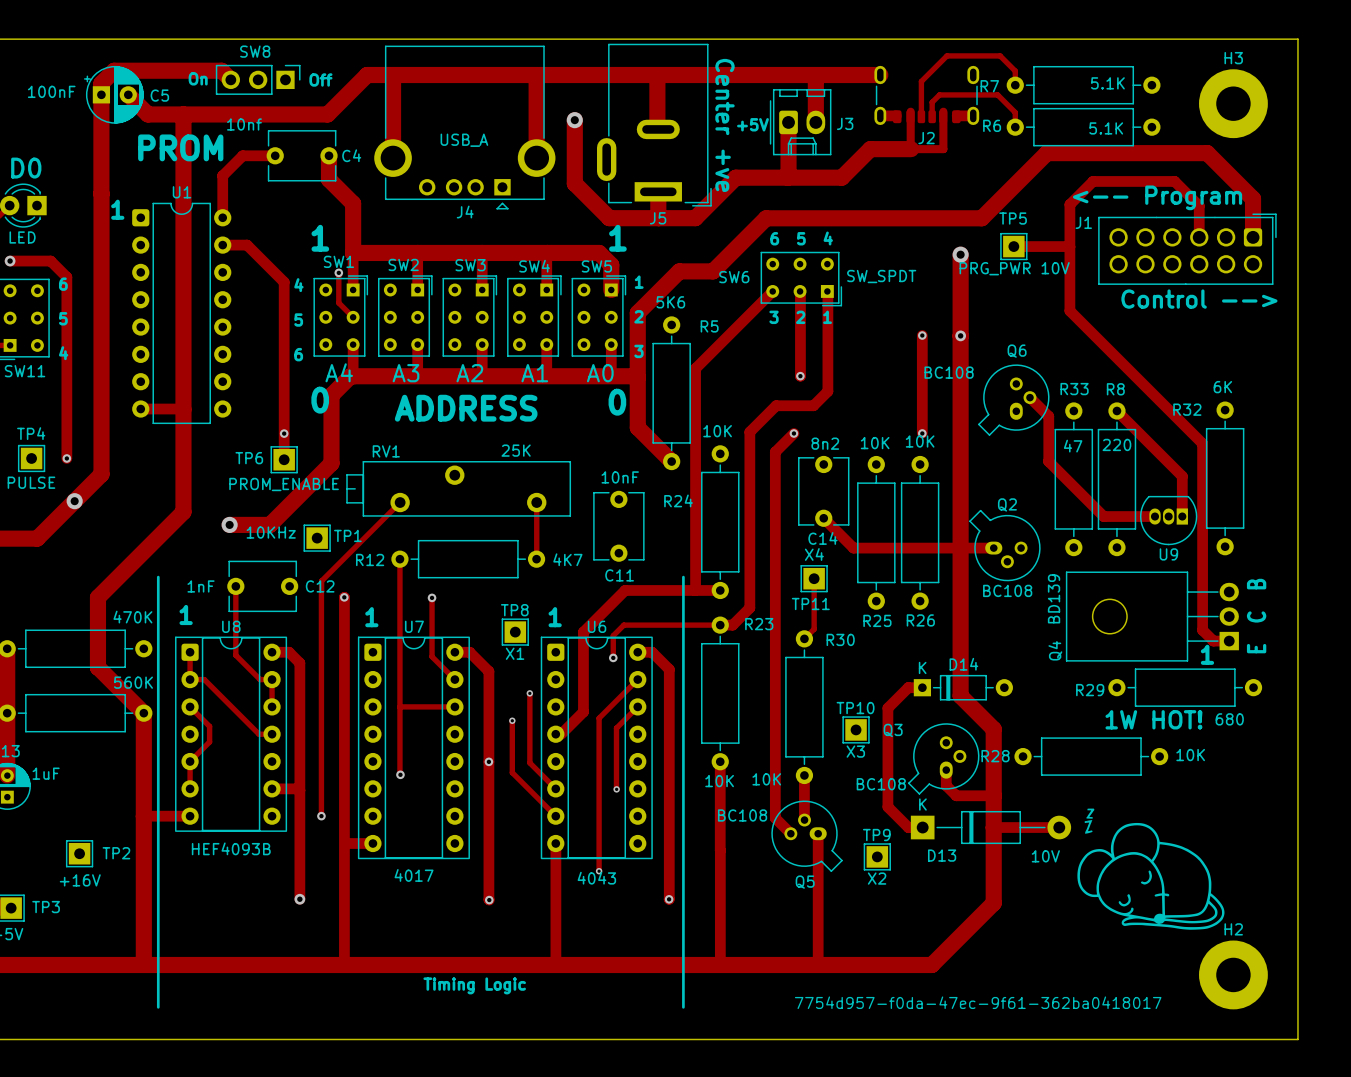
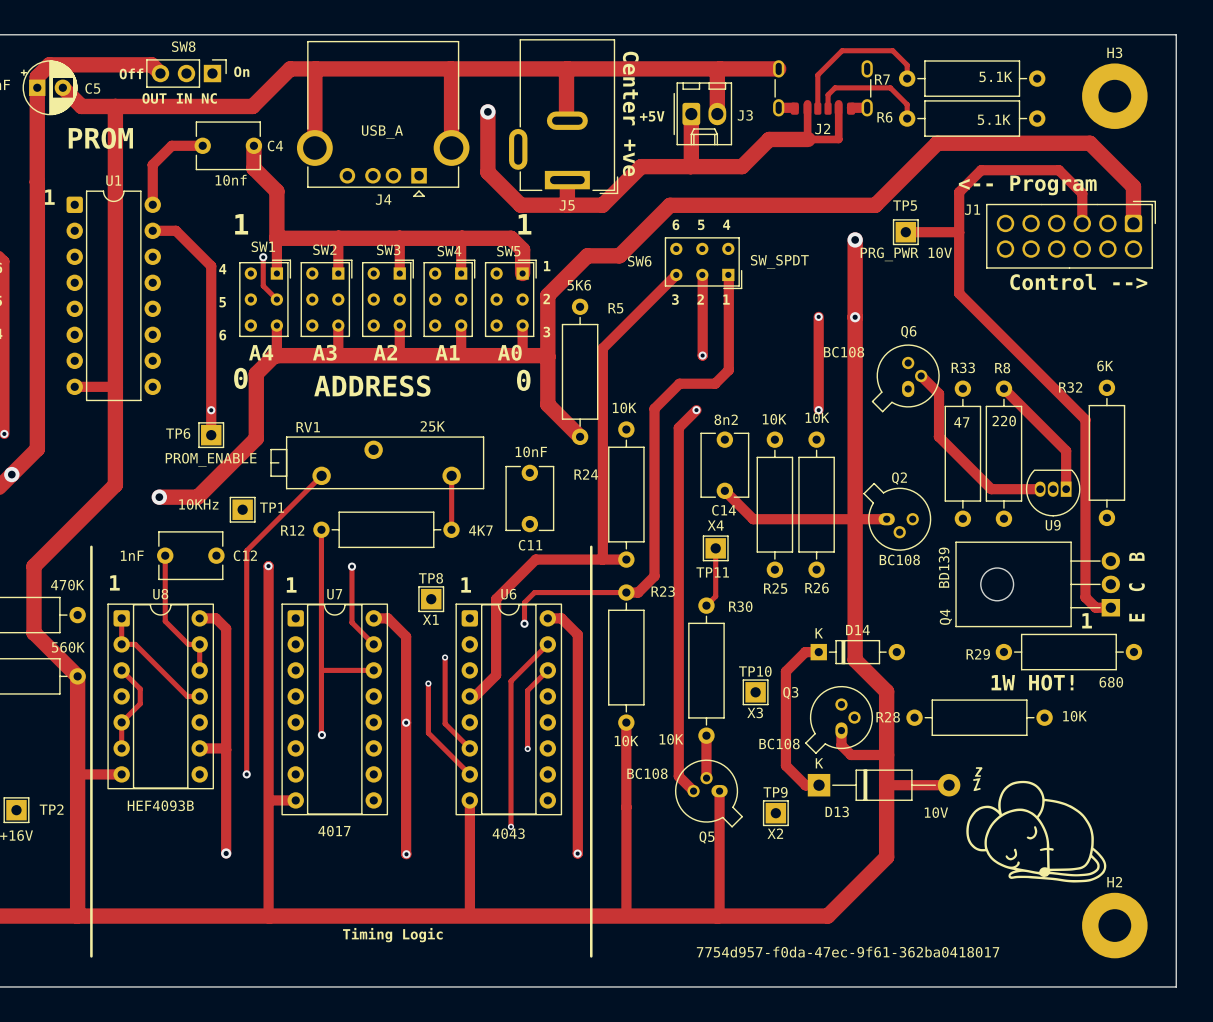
text: On (198, 78) -> Off (131, 73)
text: Off (320, 79) -> On (241, 71)
text: none -> OUT IN NC (179, 98)
C4 value position: 10nf (244, 124) -> 10nf (231, 180)

